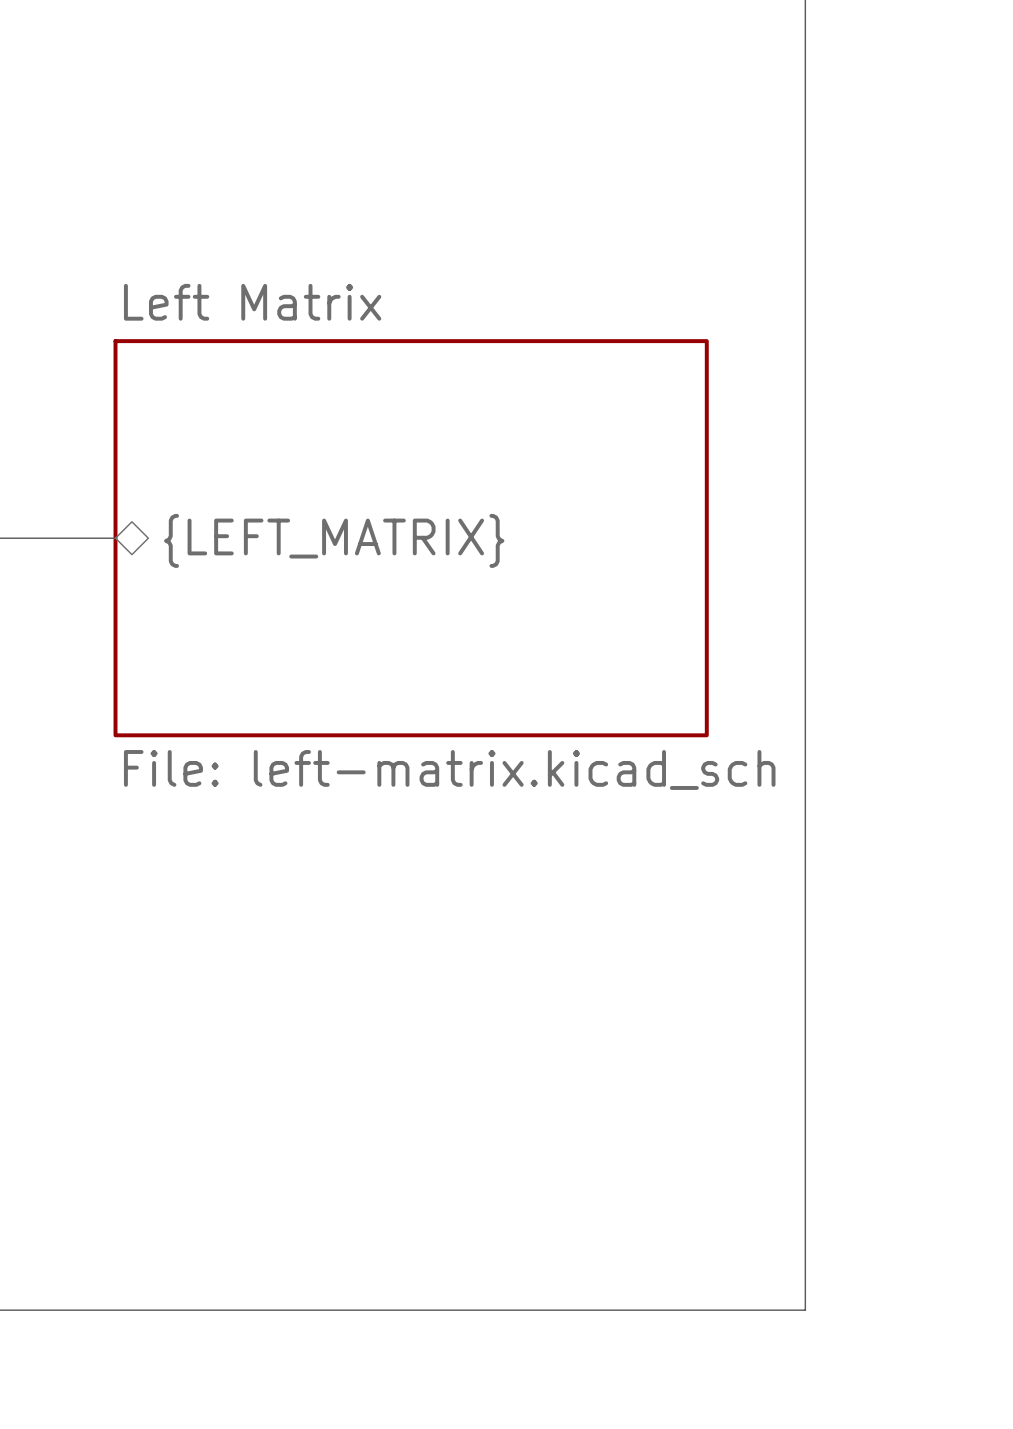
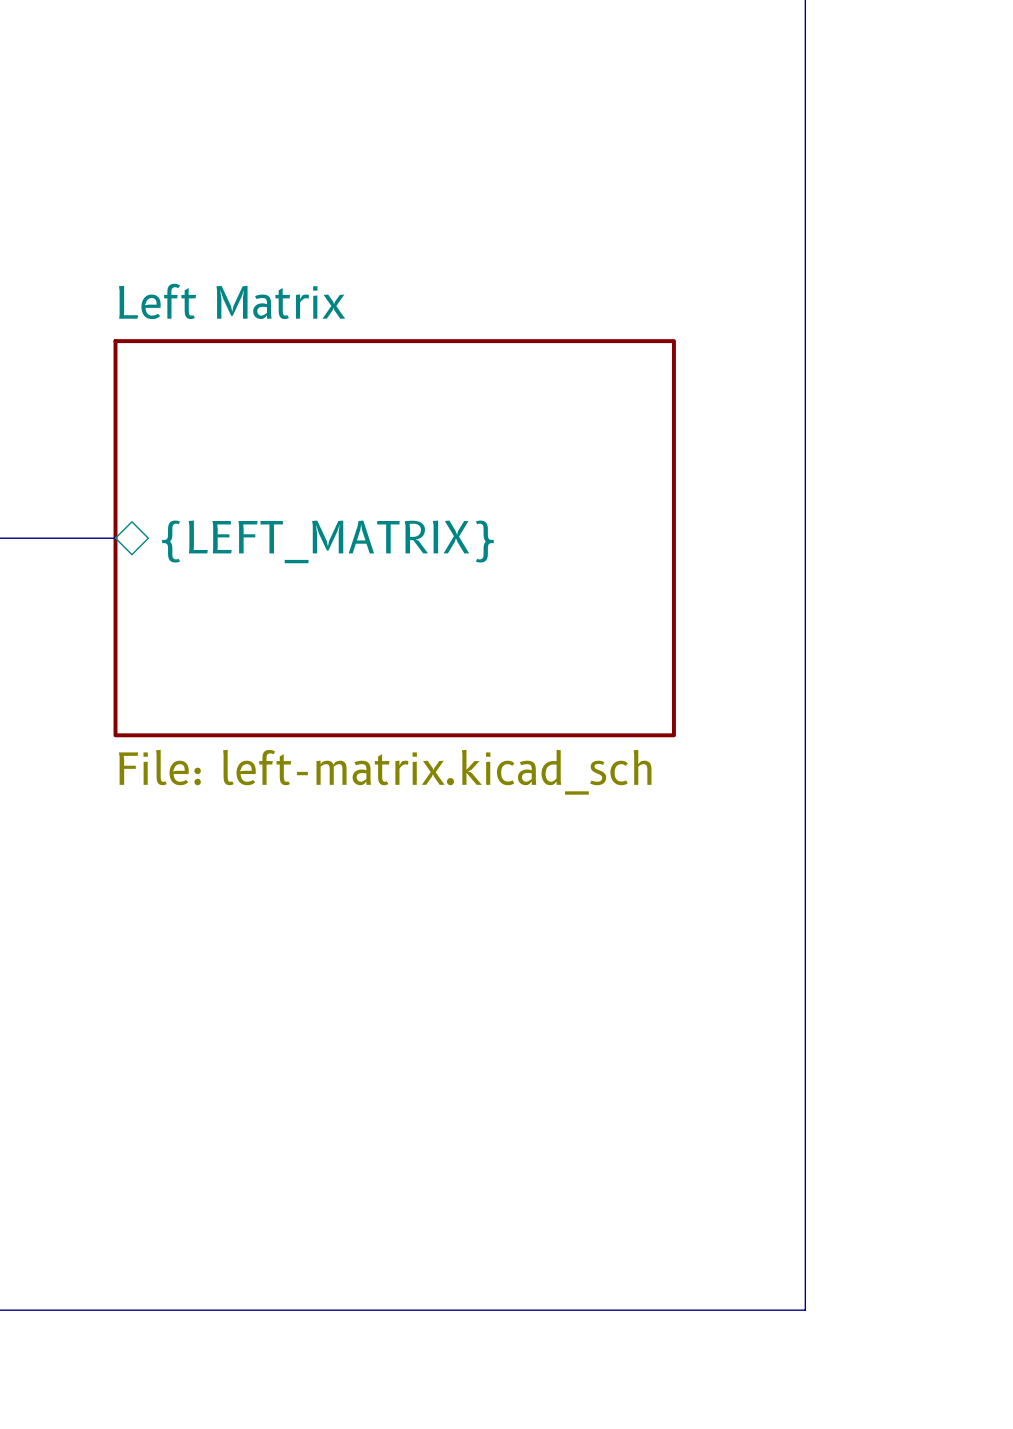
sheet Left Matrix shape: [113, 339, 709, 738] -> [113, 339, 676, 738]

